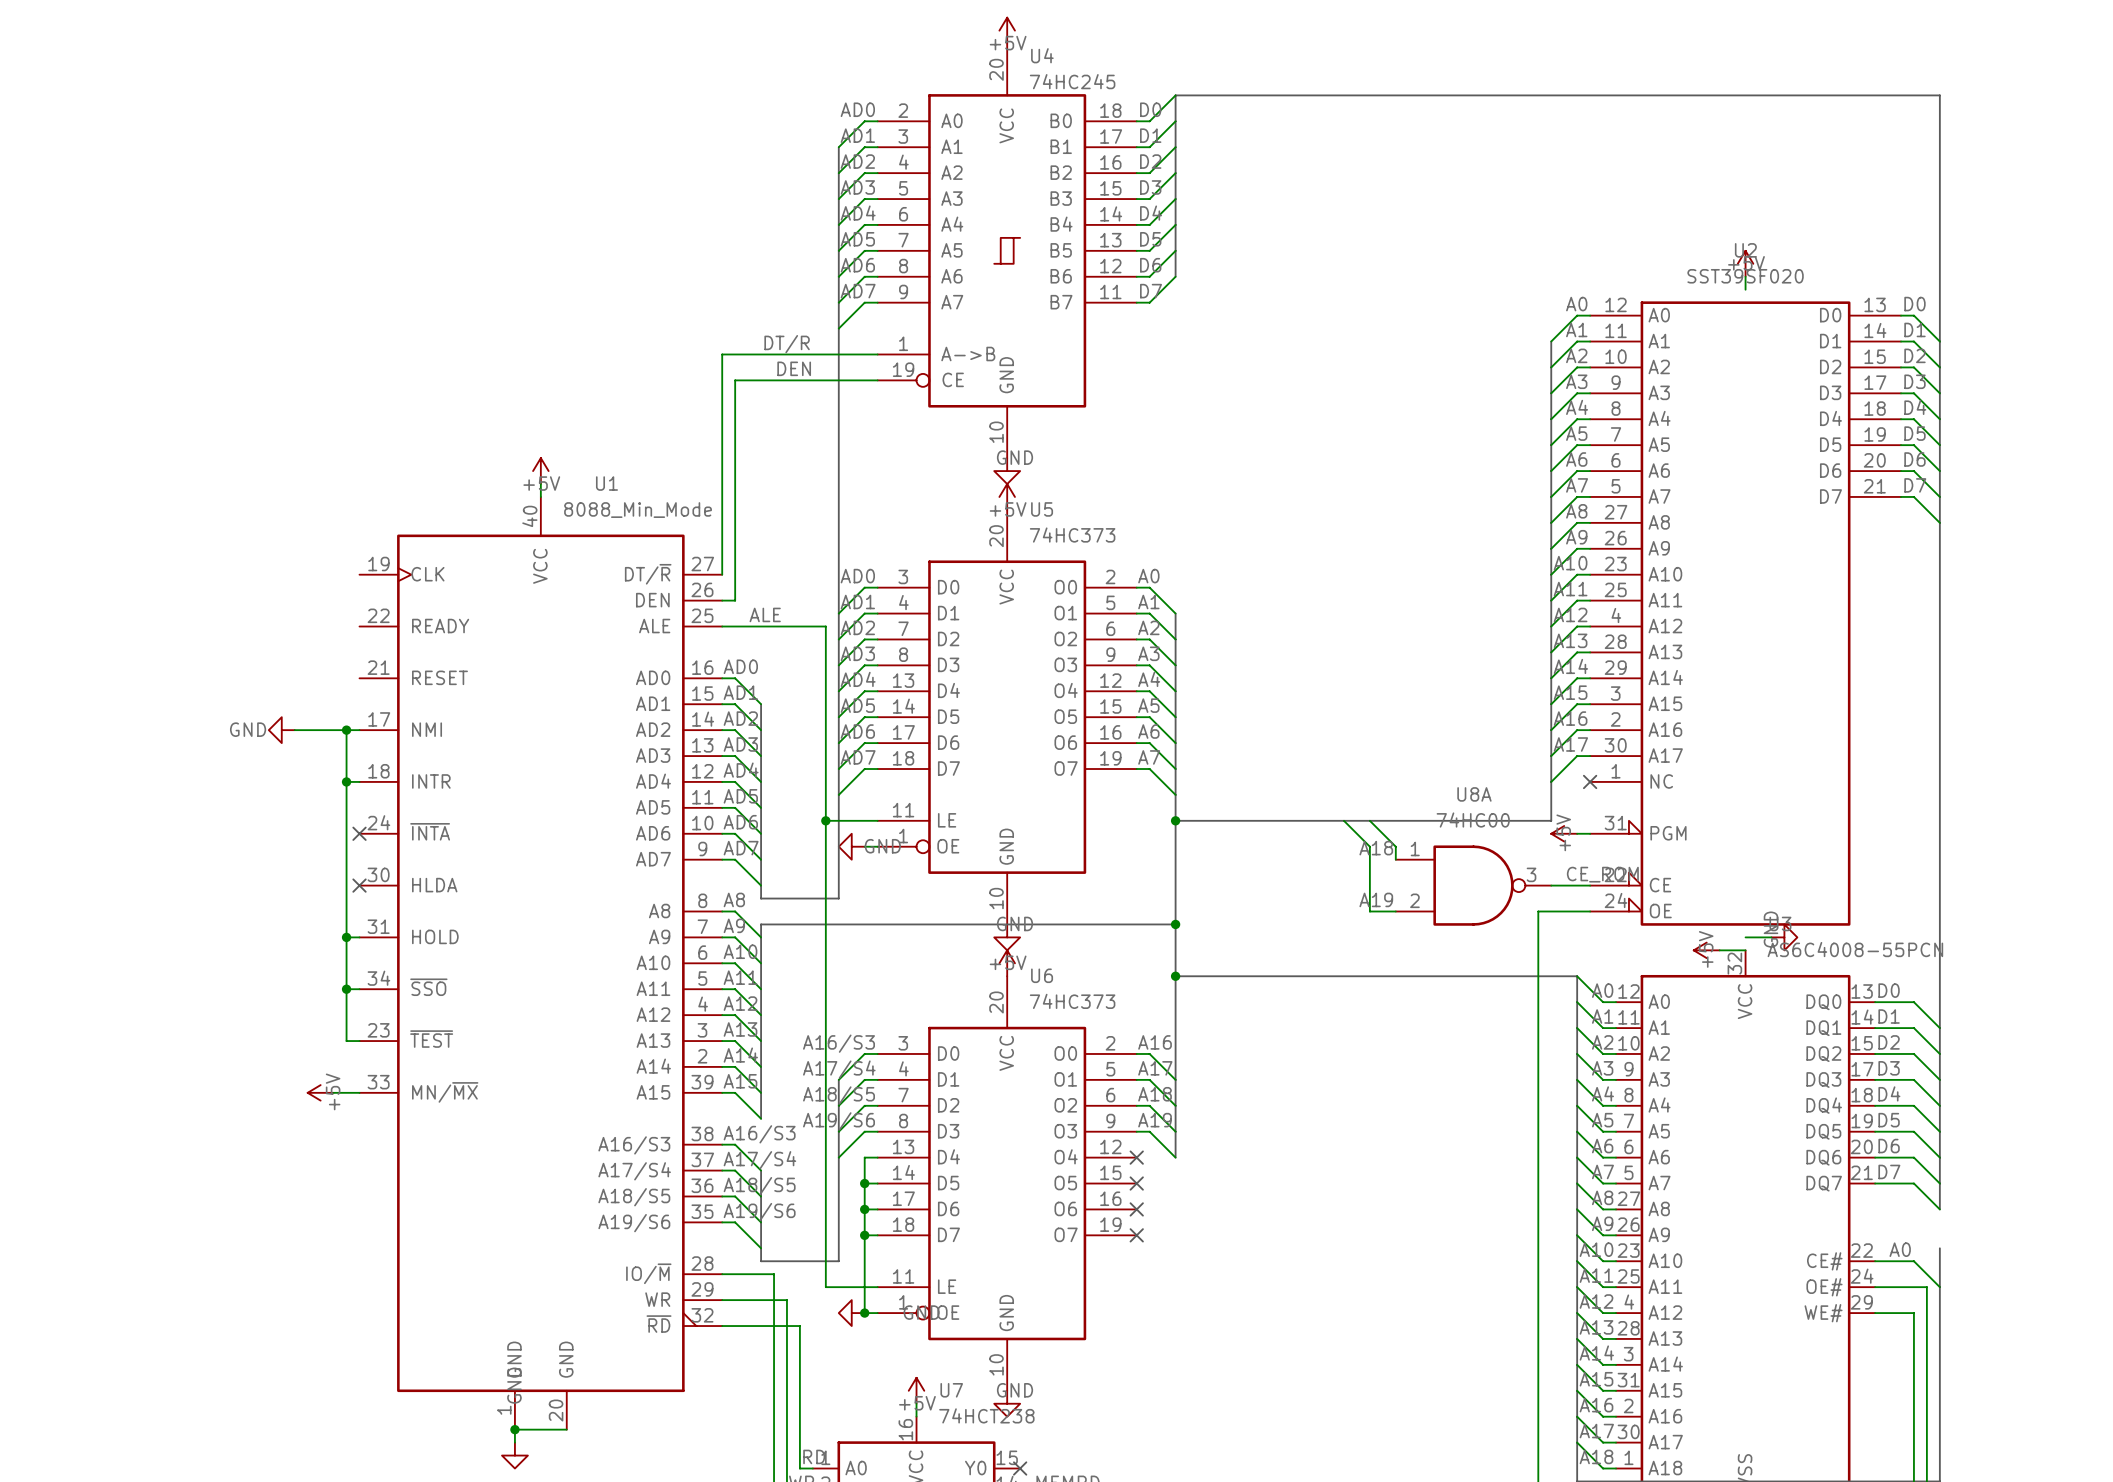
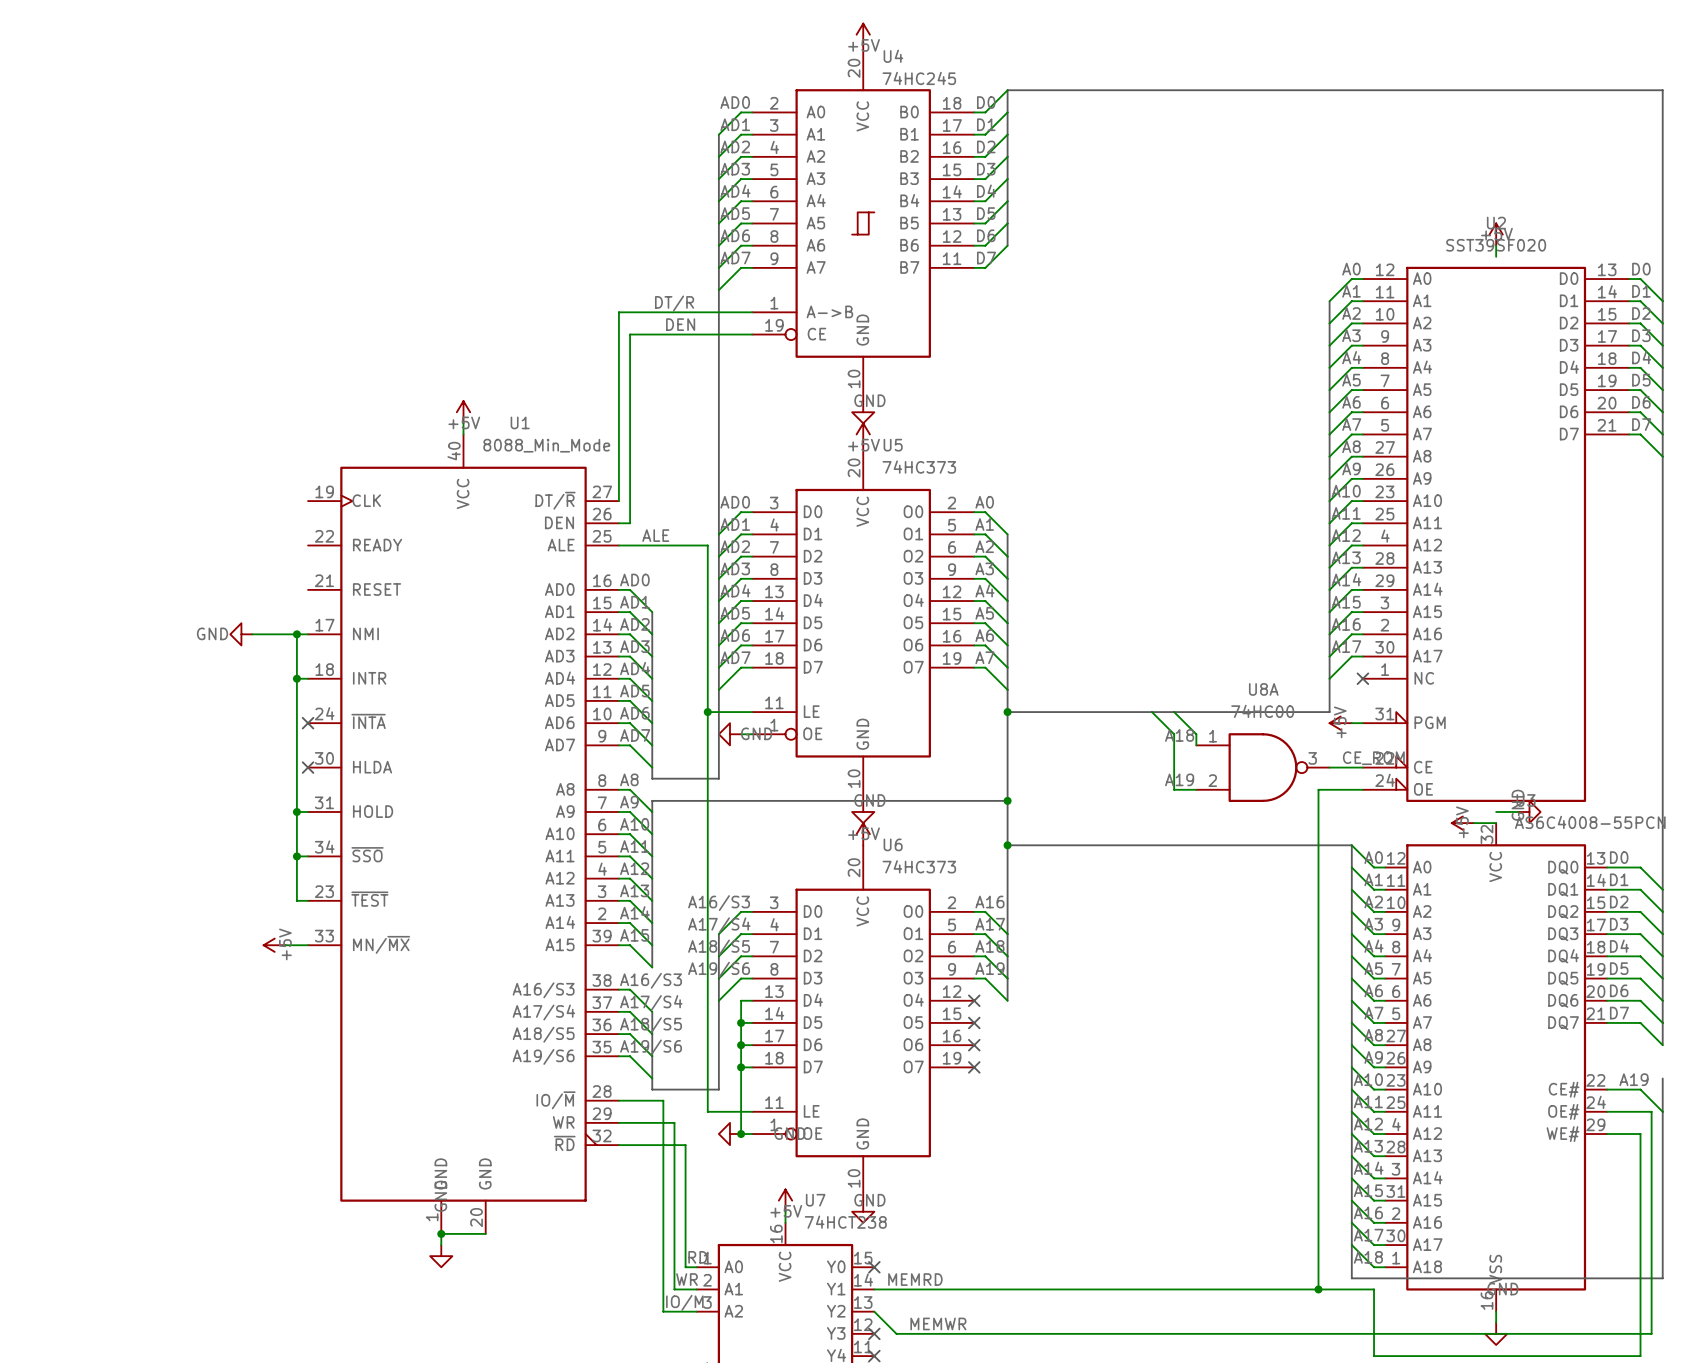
label: A0 (1900, 1249) -> A19 (1633, 1079)

